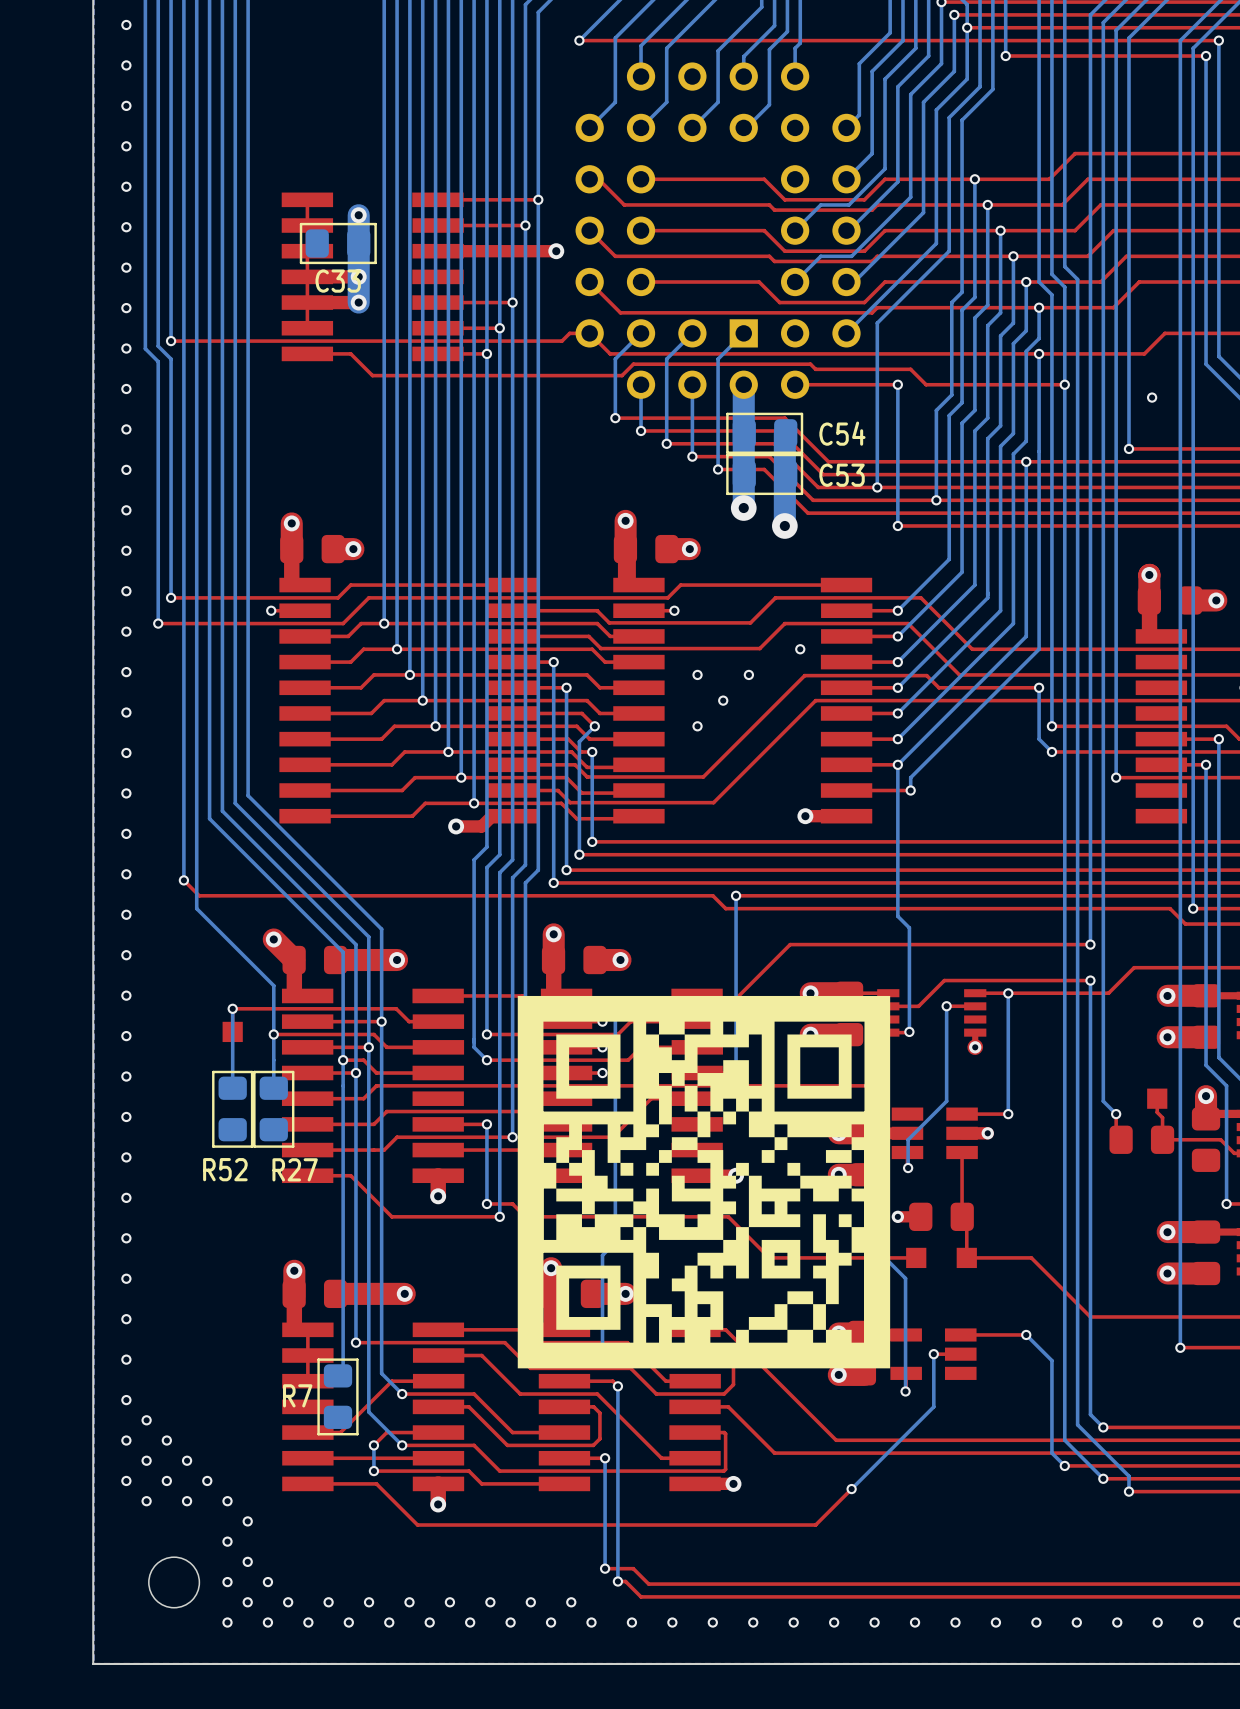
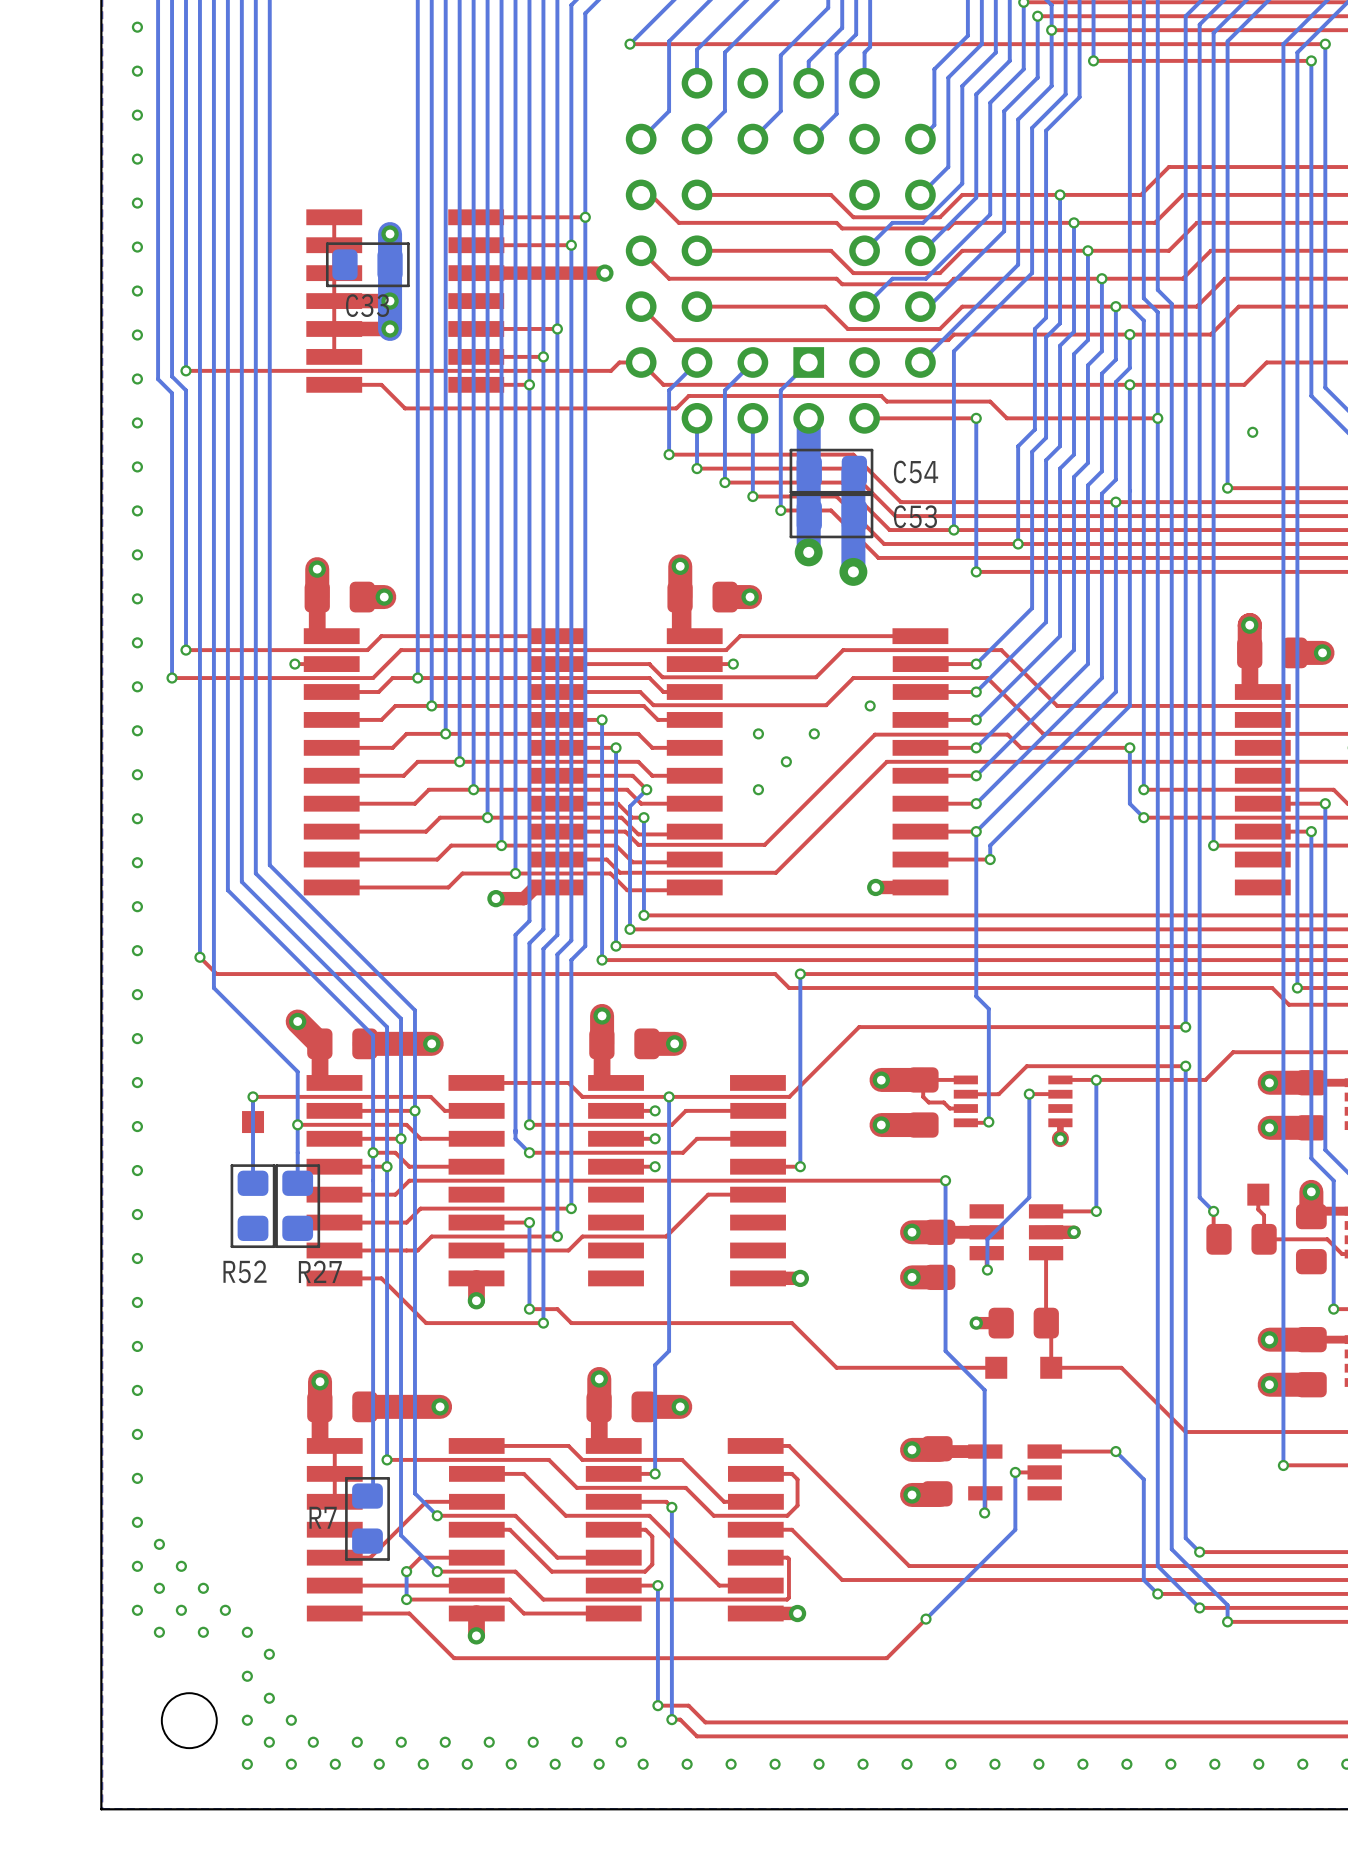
drawing: [517, 995, 891, 1369] -> none

